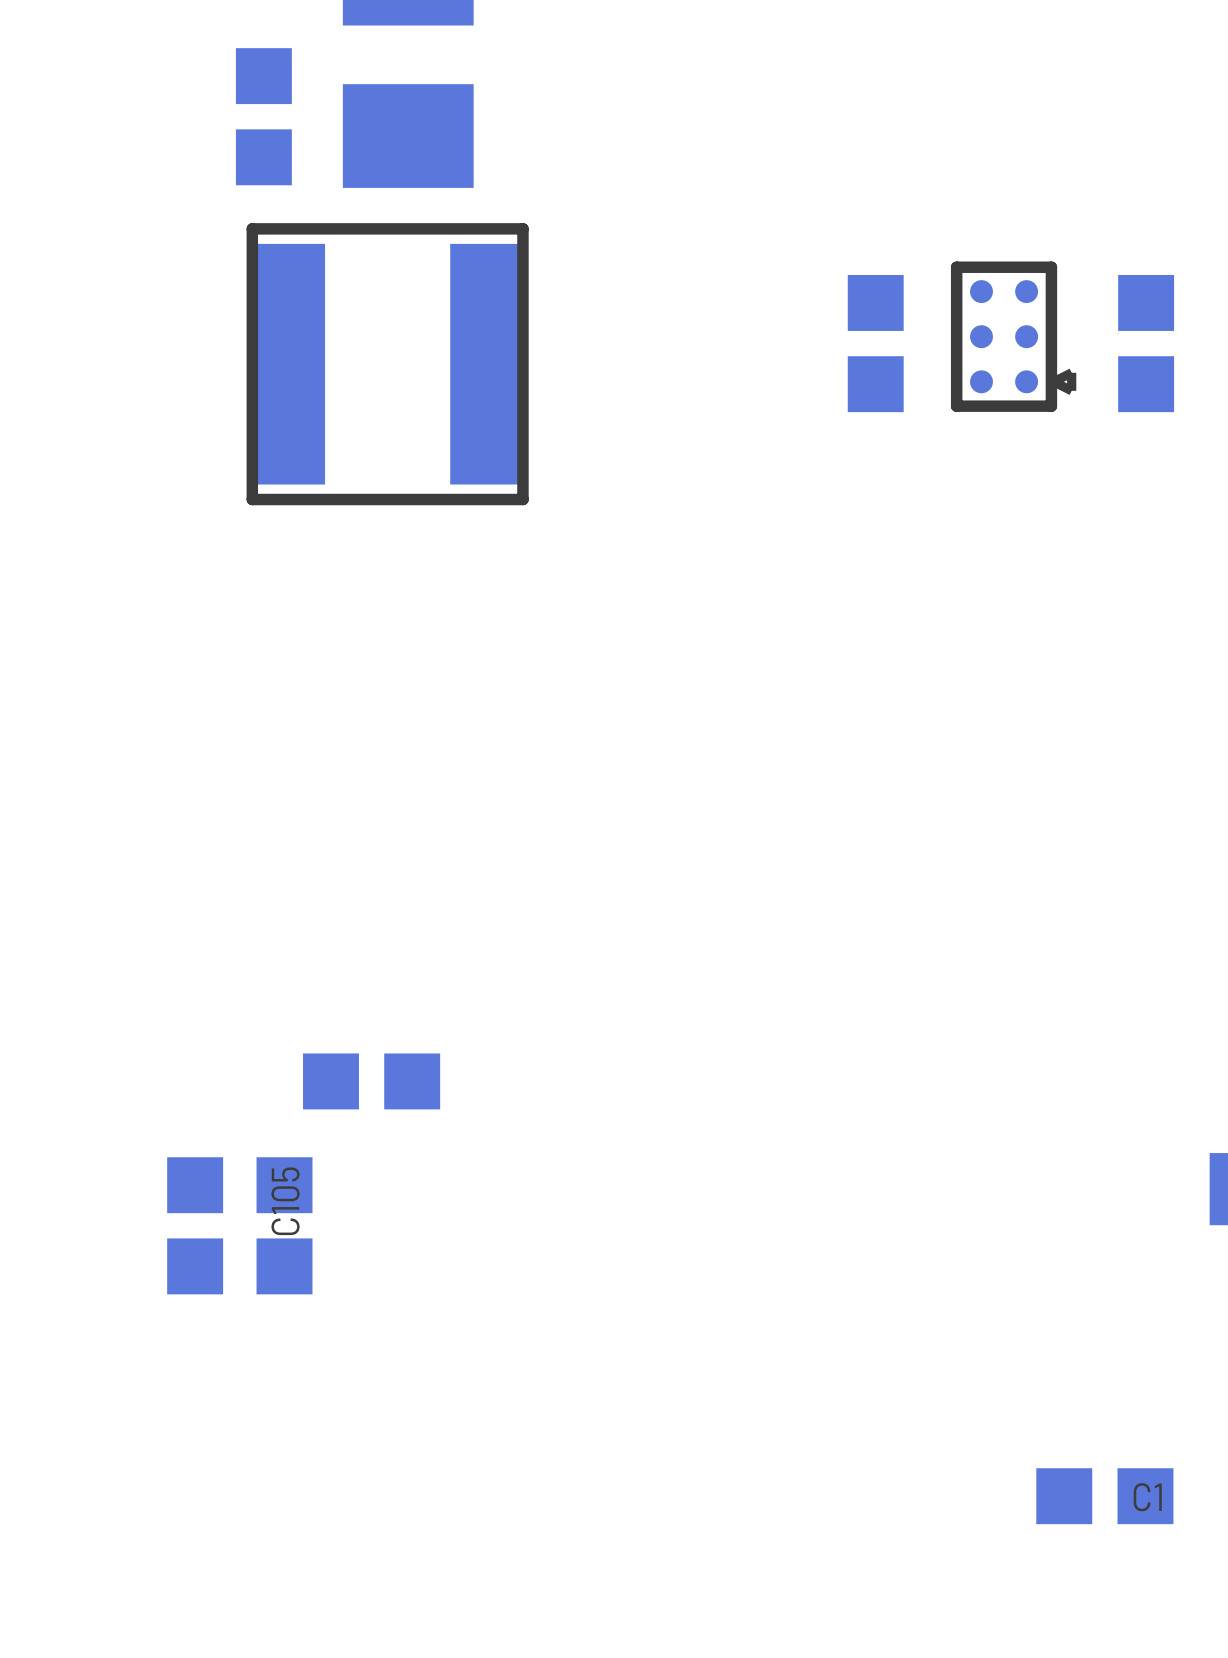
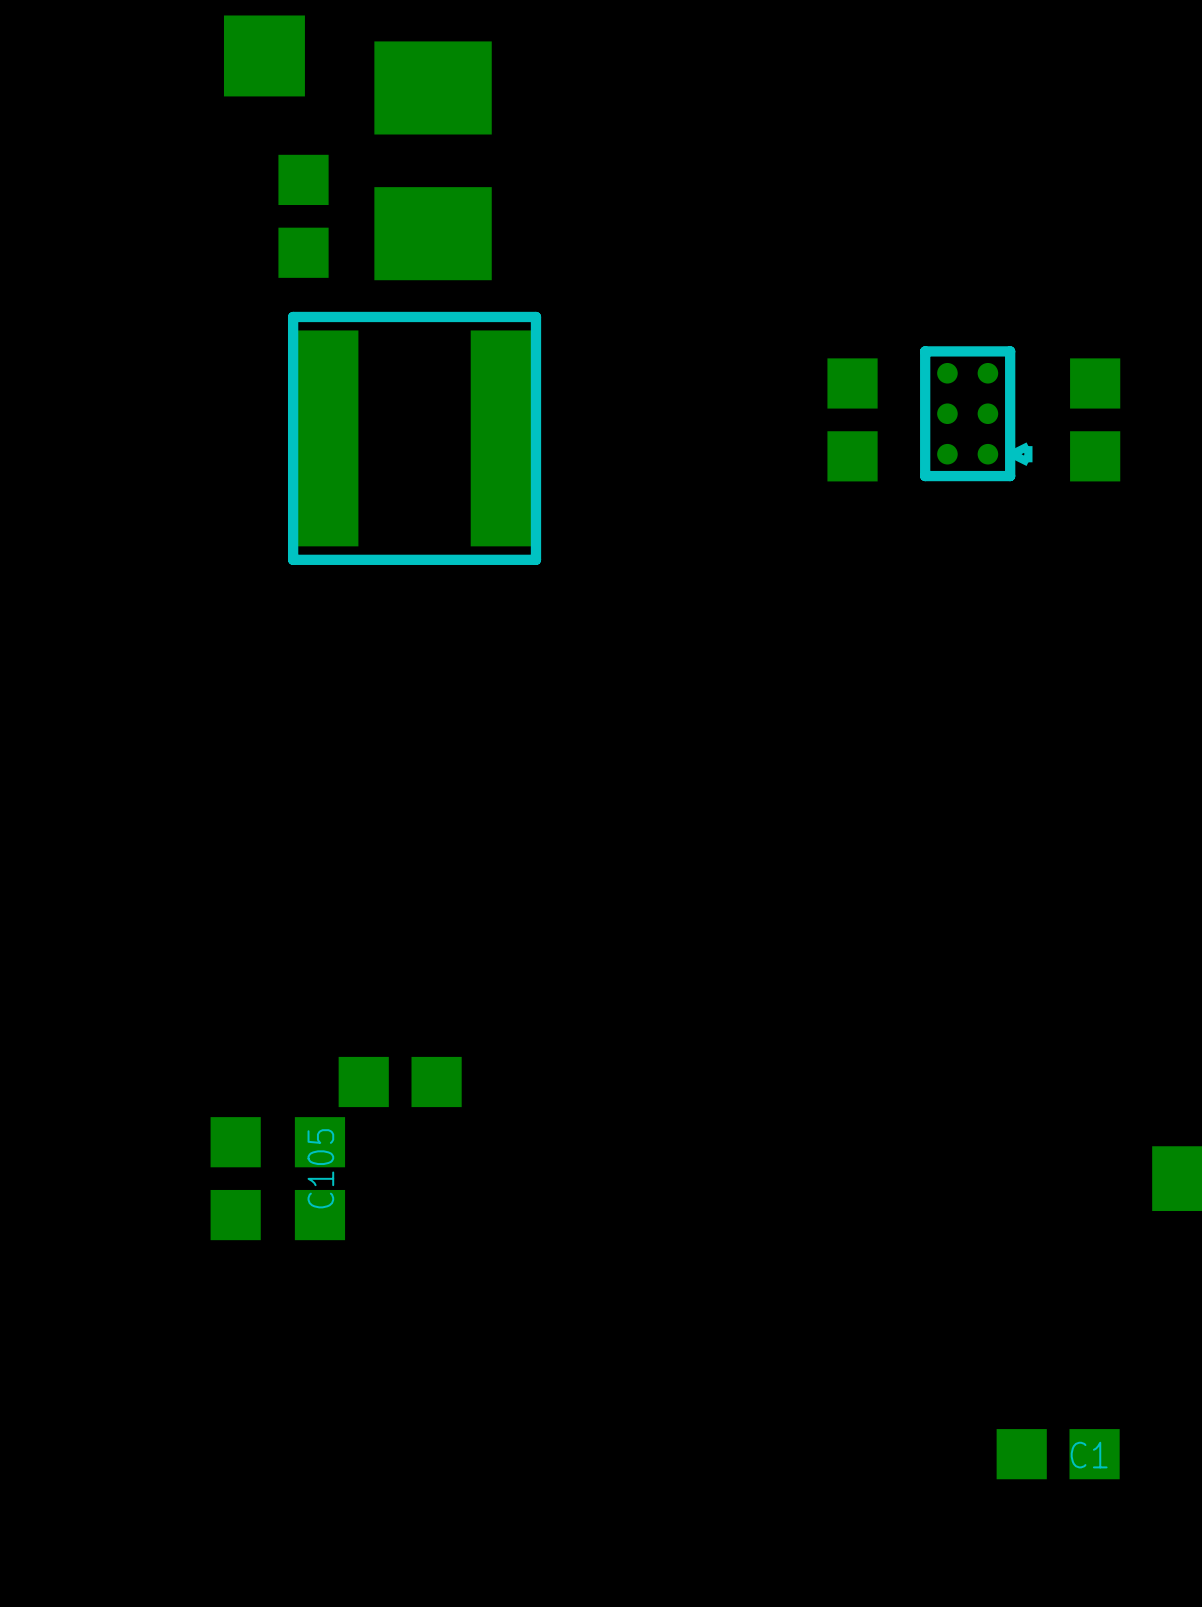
part position: (195, 1225) -> (235, 1178)
C105 position: (284, 1225) -> (319, 1178)

